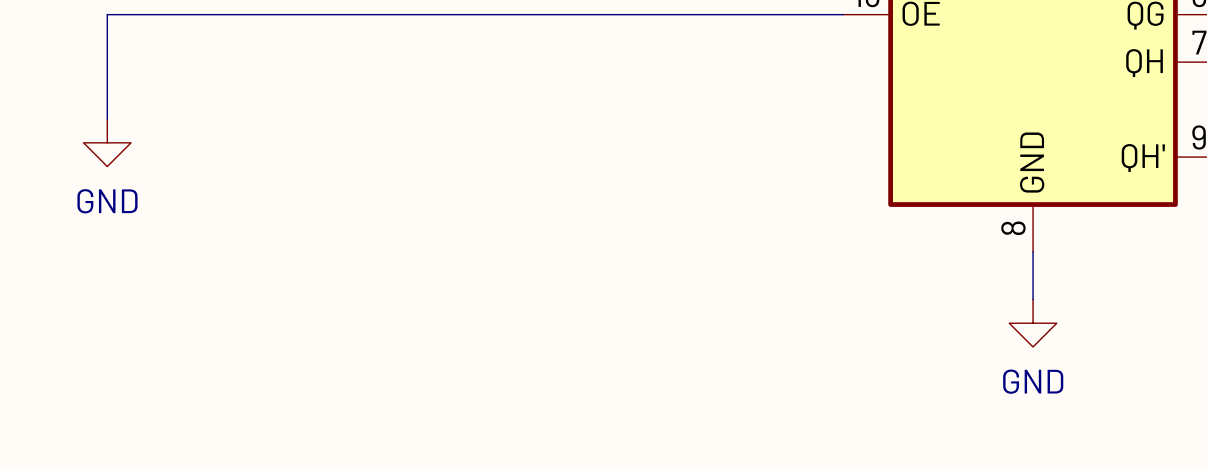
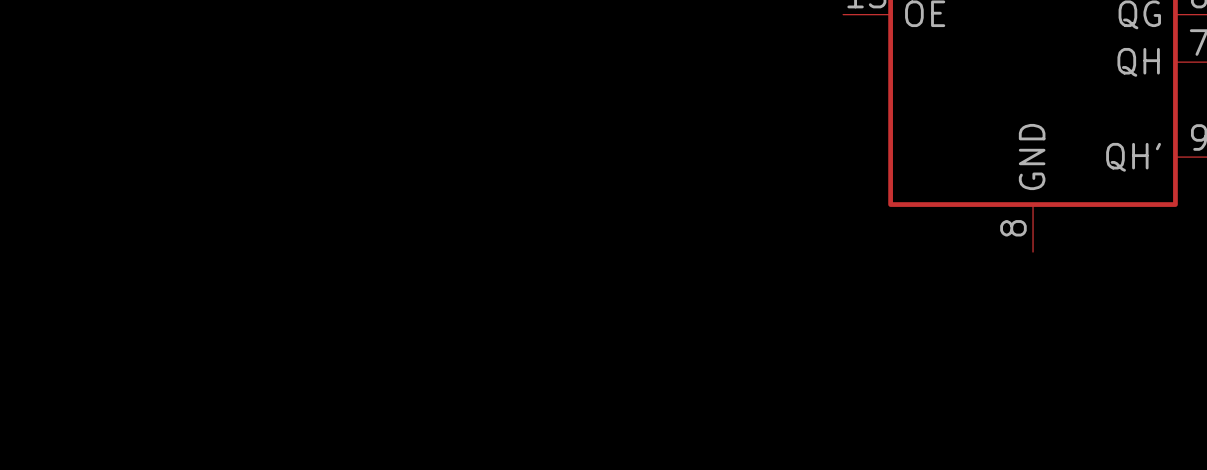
wire: (843, 14) (107, 14) (107, 119) -> none
power symbol: GND (107, 142) -> none
wire: (1033, 252) (1033, 299) -> none
power symbol: GND (1033, 323) -> none

